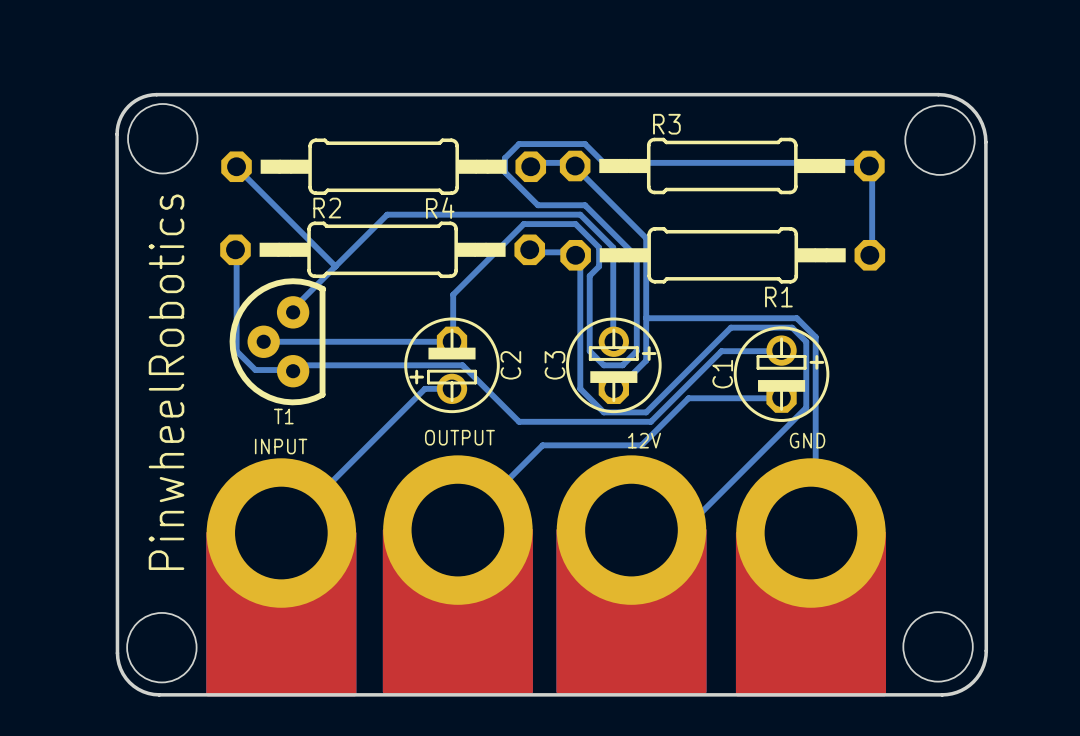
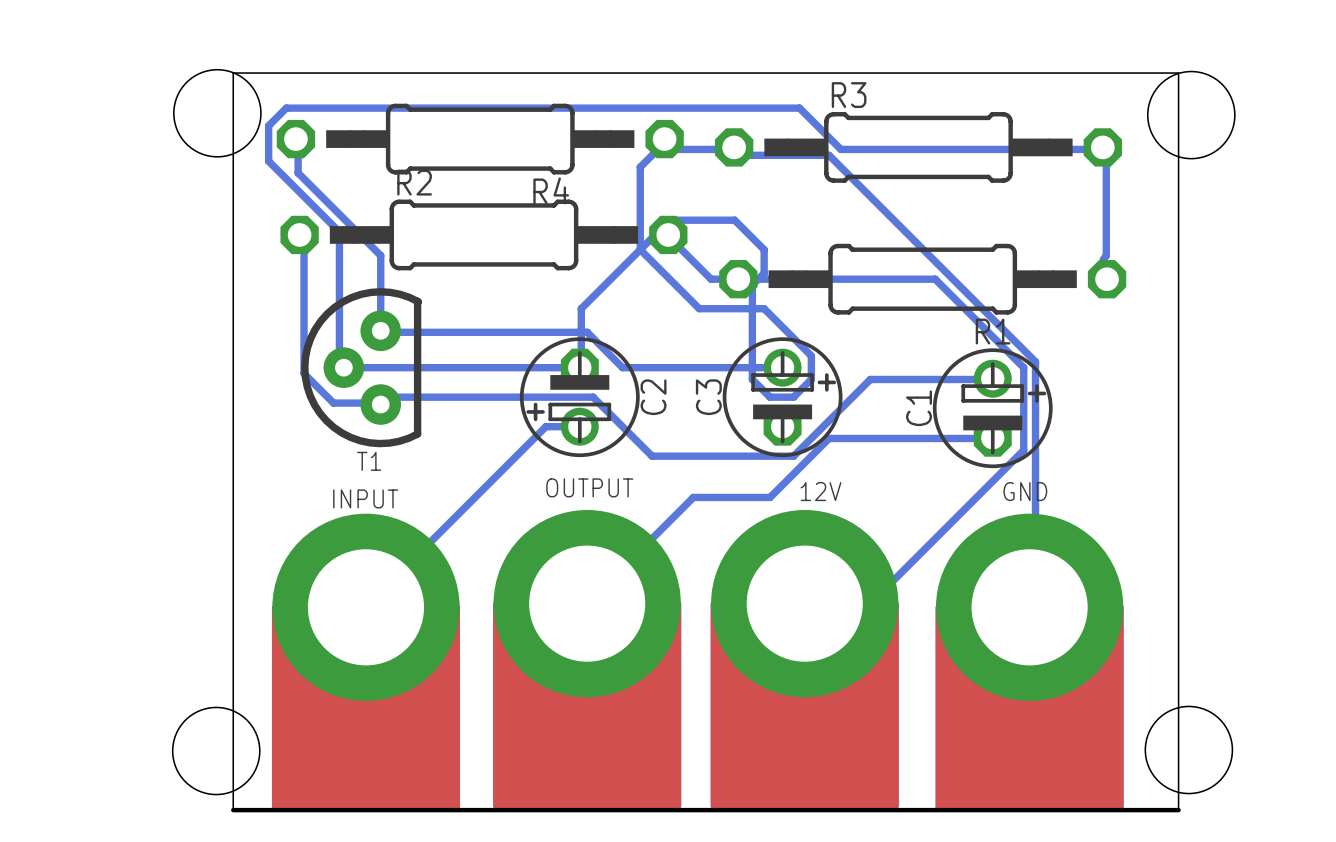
bottom track: none -> (295, 139) (298, 143) (298, 173) (380, 255) (380, 326)
bottom track: (236, 166) (335, 266) -> none
R4 position: (383, 166) -> (480, 139)
bottom track: (530, 166) (533, 162) (570, 162) (646, 238) (646, 360) (617, 388) -> none
bottom track: (872, 172) (872, 167) (867, 162) (603, 162) (585, 144) (519, 144) (504, 158) (504, 172) (537, 205) (585, 205) (636, 257) (636, 332) -> (1106, 155) (1103, 150) (1100, 149) (840, 149) (799, 108) (286, 108) (268, 125) (268, 161) (339, 232) (339, 367) (343, 367)
bottom track: none -> (668, 234) (711, 279) (935, 279) (1006, 349)
bottom track: (235, 249) (236, 351) -> (299, 234) (304, 237) (304, 373) (309, 379)
R2 position: (382, 249) -> (483, 234)
bottom track: (529, 249) (533, 252) (575, 252) (575, 255) (580, 257) (580, 388) (603, 412) -> none
R1 position: (722, 255) -> (922, 279)
bottom track: (293, 308) (387, 214) (580, 214) (613, 247) (613, 341) -> (380, 330) (587, 332) (622, 367) (781, 367)
bottom track: (646, 318) (796, 318) -> (811, 355) (764, 308) (699, 308) (640, 249) (640, 167) (663, 143) (664, 139) (675, 149) (734, 149) (734, 155) (829, 155) (1011, 338)
bottom track: (792, 327) (730, 327) (646, 412) (622, 412) -> (917, 379) (870, 379) (793, 456)
bottom track: (721, 351) (650, 421) (519, 421) (509, 412) -> (770, 456) (652, 456)
text: PinwheelRobotics (166, 382) -> none
bottom track: (688, 398) (641, 445) (603, 445) -> (876, 438) (829, 438) (770, 497)
board edge: (175, 694) (148, 693) (133, 686) (123, 673) (117, 653) (117, 129) (120, 117) (128, 106) (143, 96) (156, 94) (938, 94) (950, 96) (967, 104) (976, 113) (982, 123) (985, 142) (986, 655) (979, 674) (965, 688) (952, 693) (929, 694) -> (233, 810) (233, 73) (1178, 73) (1178, 810)

